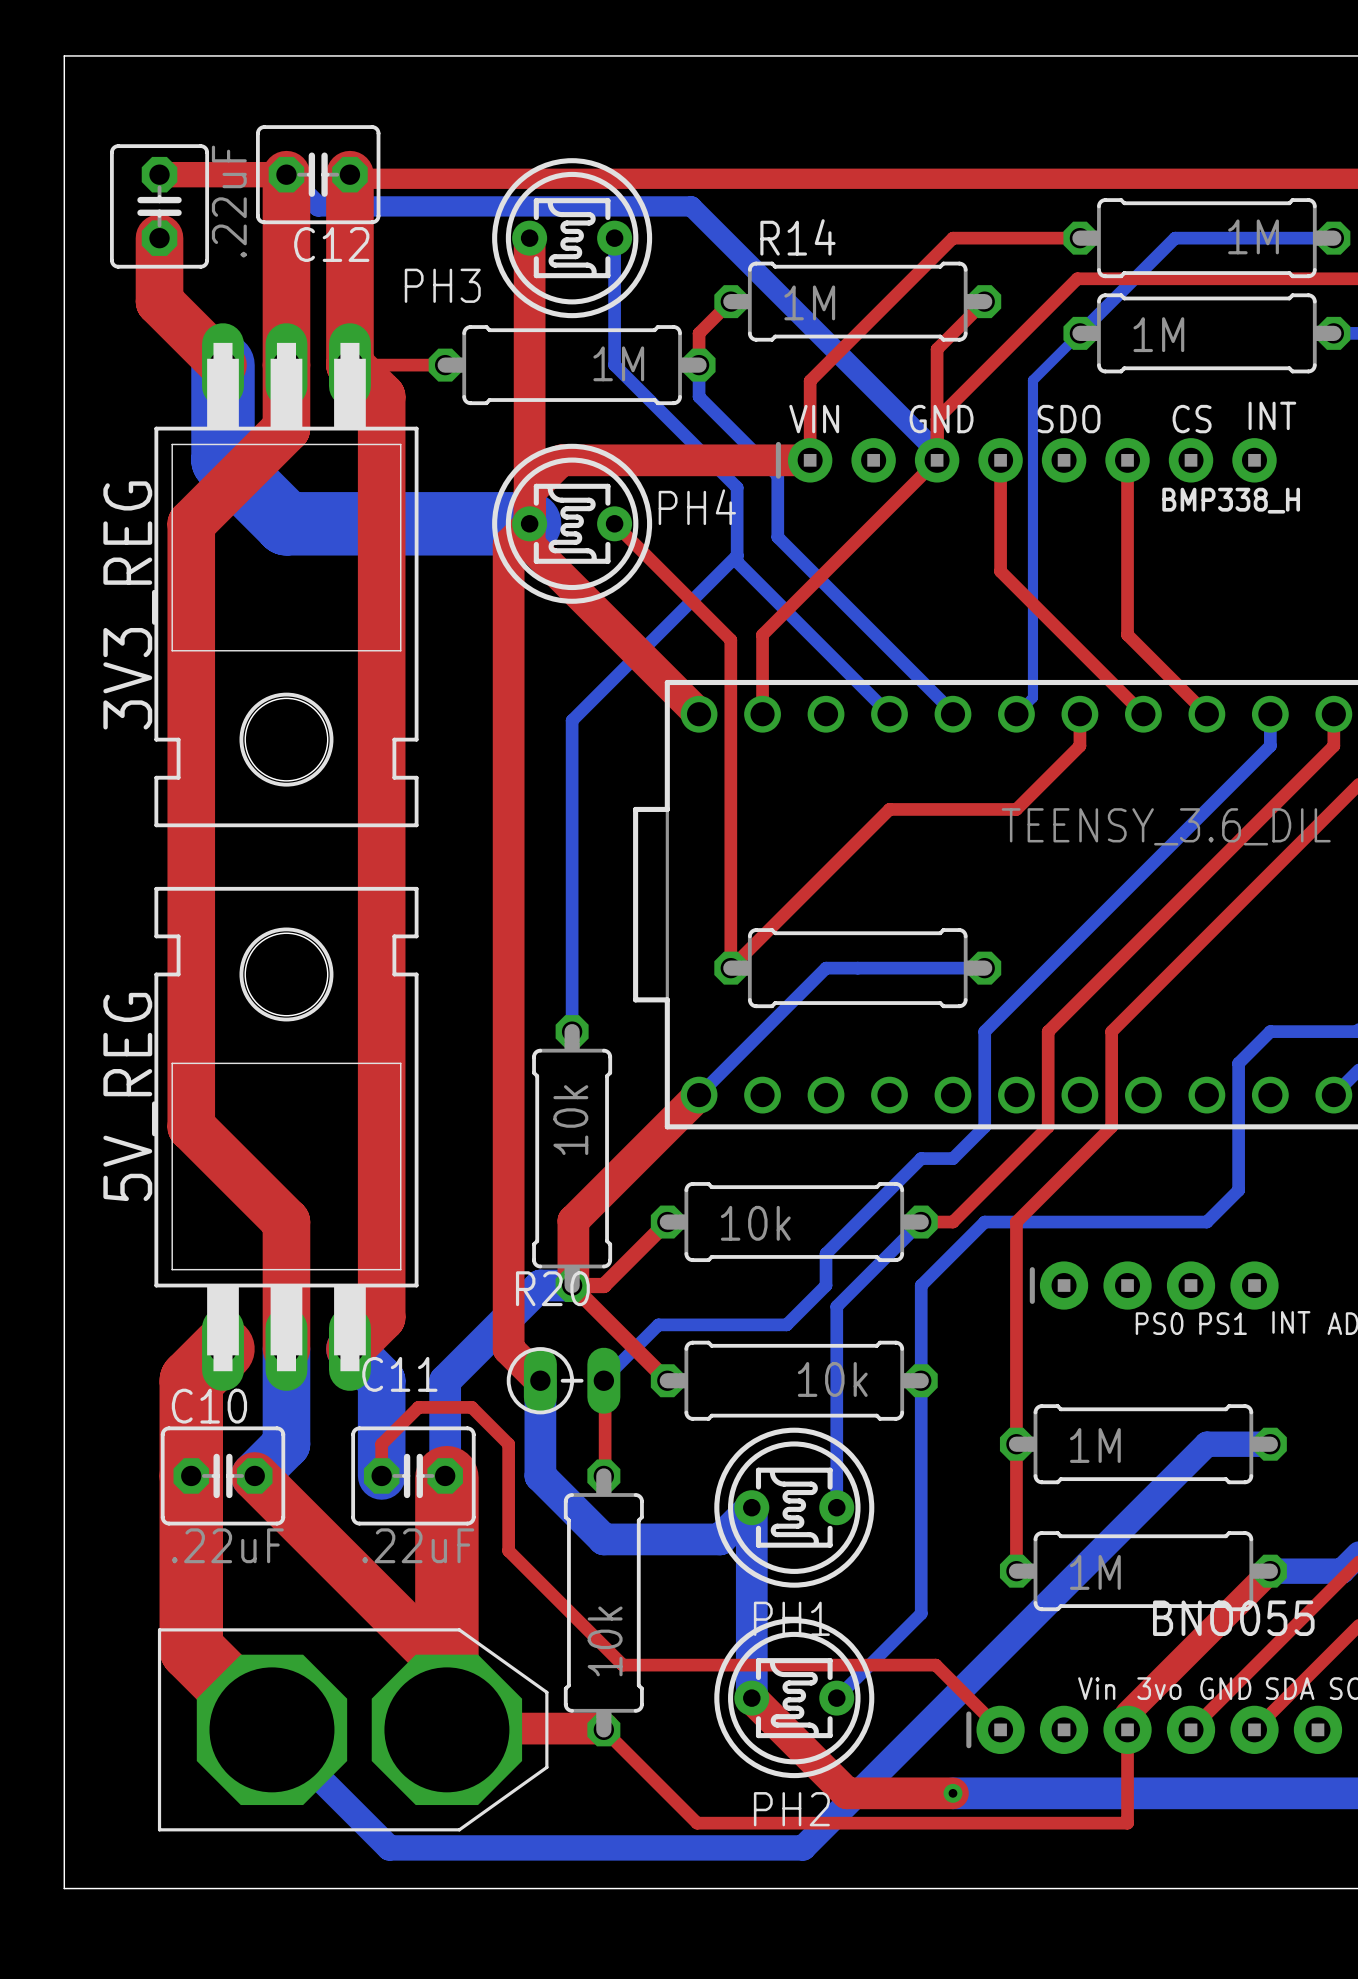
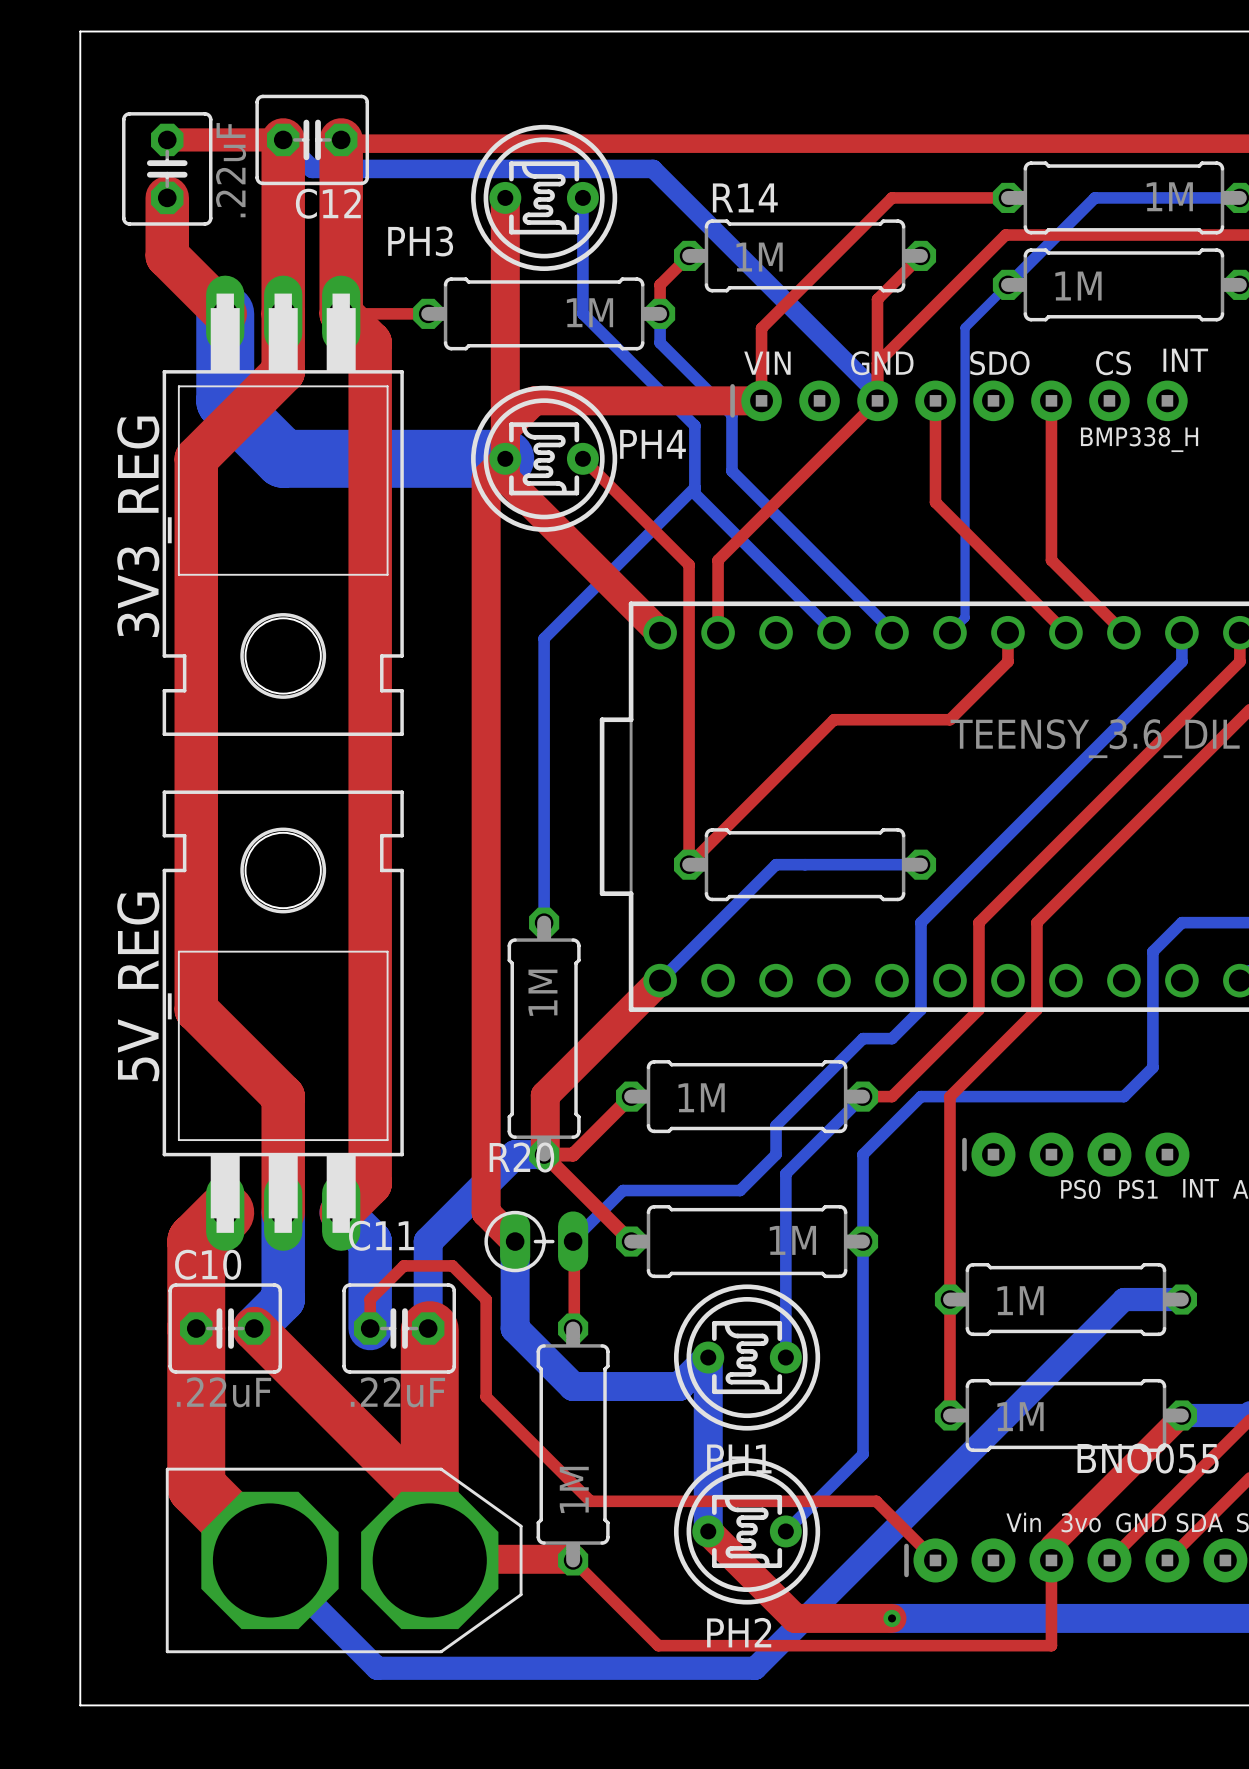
part value: 10k (570, 1120) -> 1M (542, 992)
part value: 10k (755, 1223) -> 1M (701, 1097)
part value: 10k (832, 1379) -> 1M (792, 1240)
part value: 10k (605, 1641) -> 1M (574, 1489)

